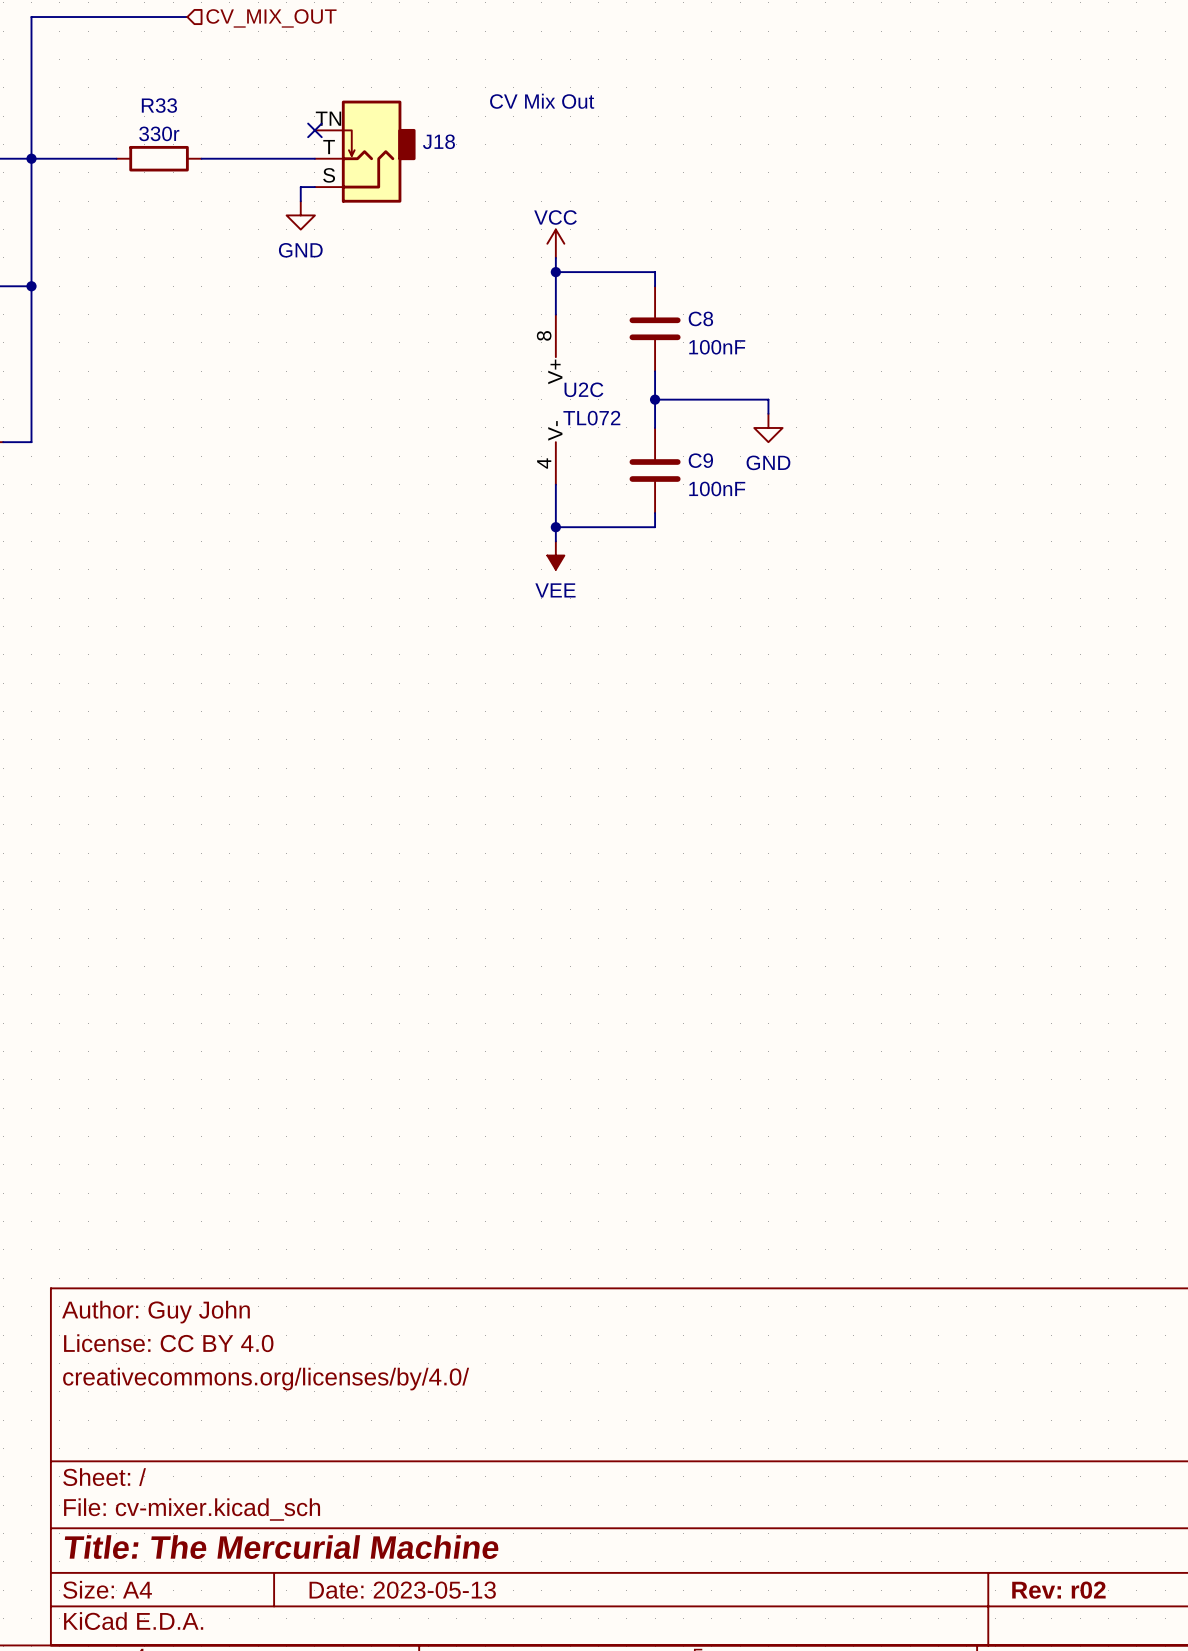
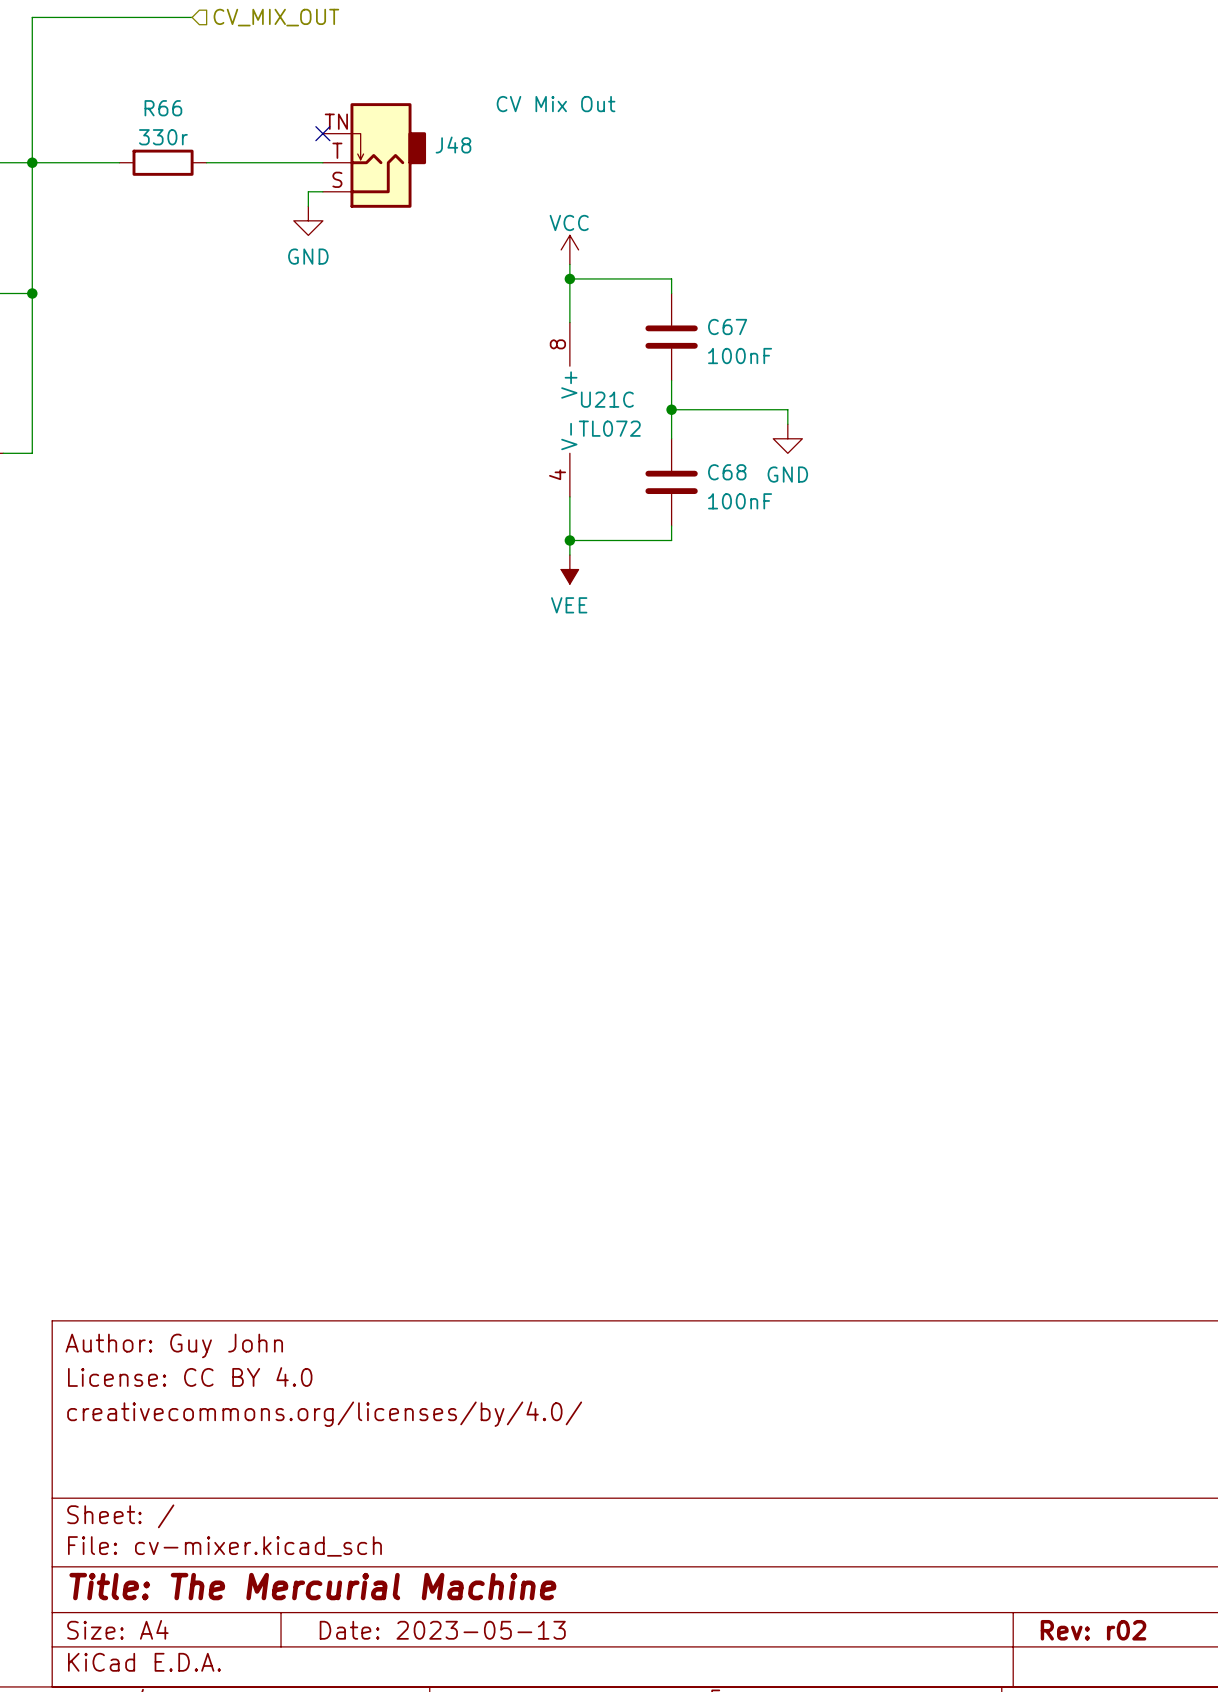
R33 name: R33 (159, 105) -> R66 (163, 108)
J18 name: J18 (438, 141) -> J48 (453, 145)
C8 name: C8 (700, 318) -> C67 (727, 326)
U2C name: U2C (583, 389) -> U21C (607, 399)
C9 name: C9 (700, 460) -> C68 (727, 472)

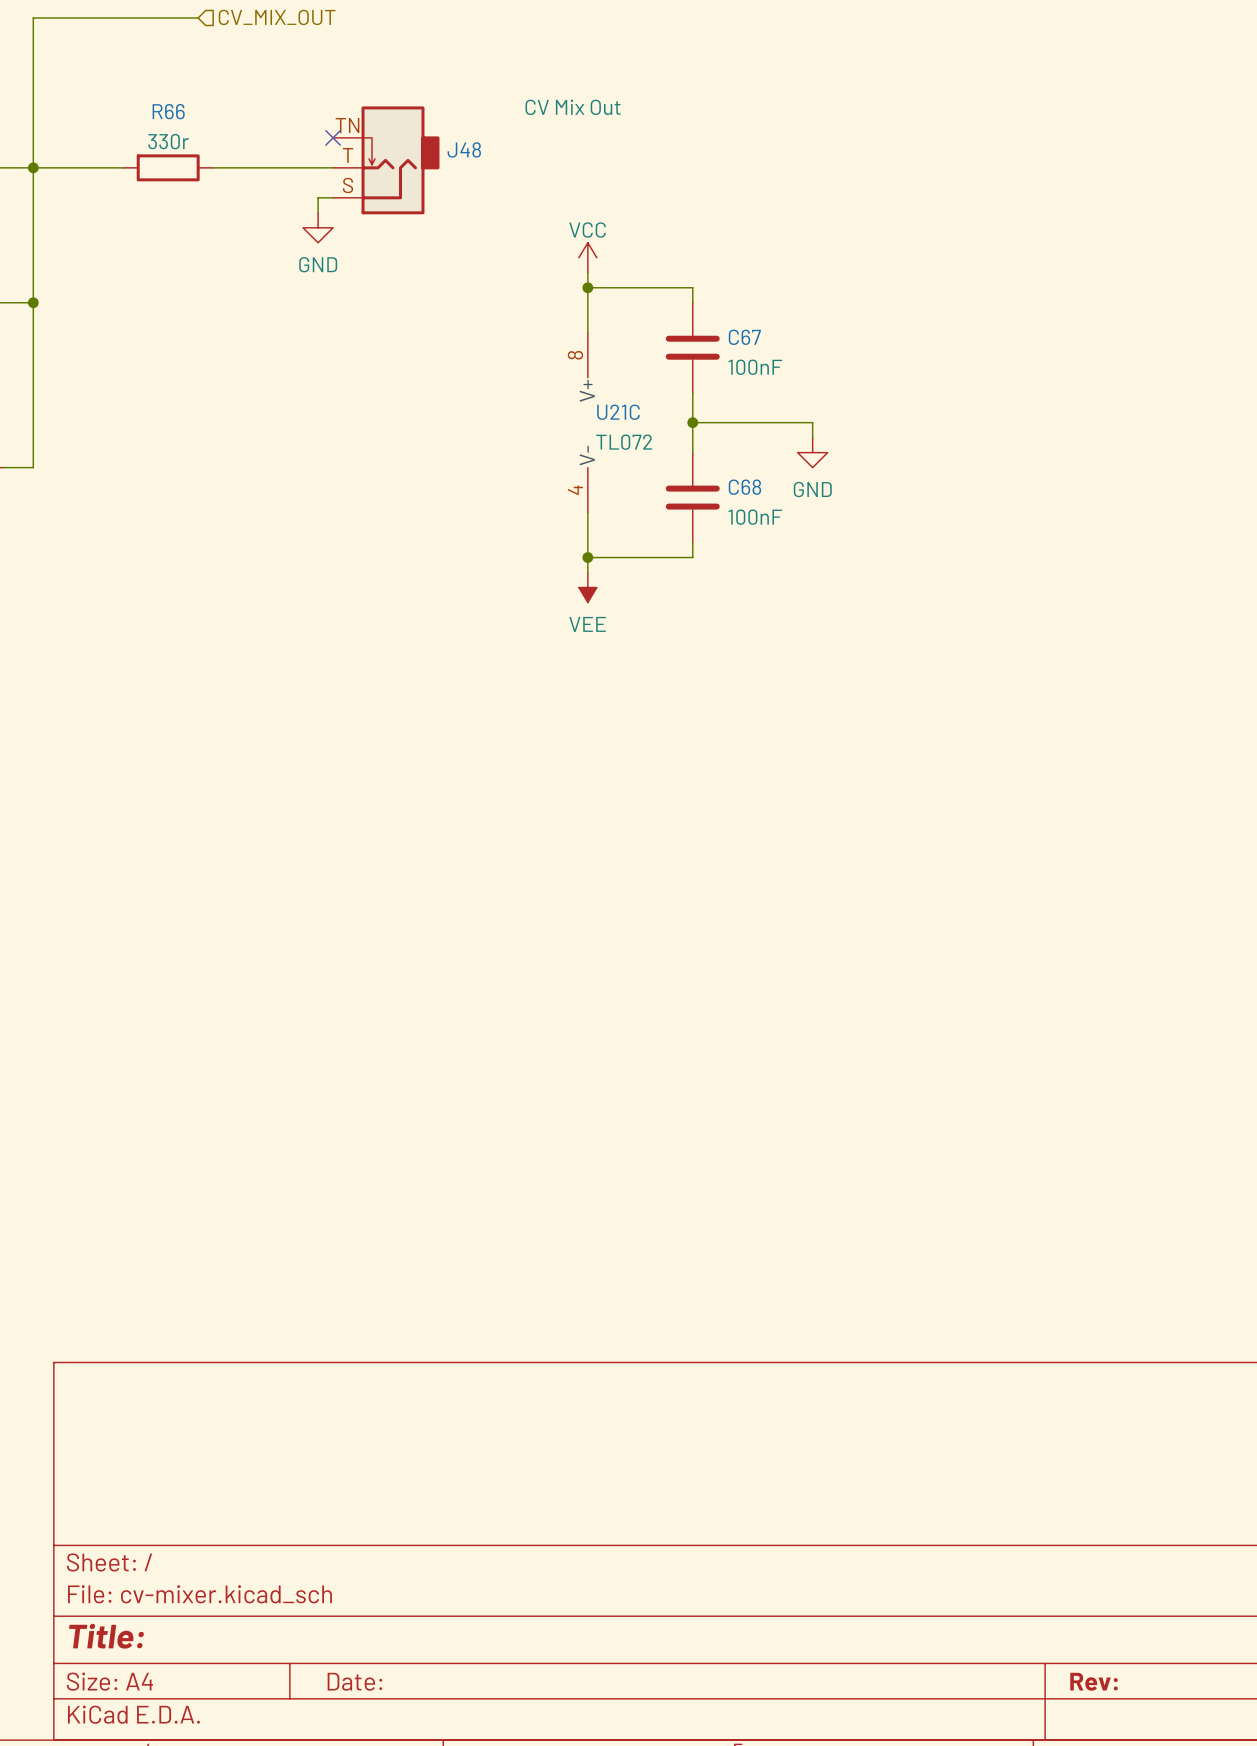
title block: Author: Guy John (174, 1345) -> none
title block: License: CC BY 4.0 (190, 1377) -> none
title block: creativecommons.org/licenses/by/4.0/ (324, 1414) -> none
title block: Title: The Mercurial Machine (312, 1586) -> Title: (106, 1636)
title block: Date: 2023-05-13 (442, 1630) -> Date: (354, 1681)
title block: Rev: r02 (1093, 1630) -> Rev: (1094, 1681)

